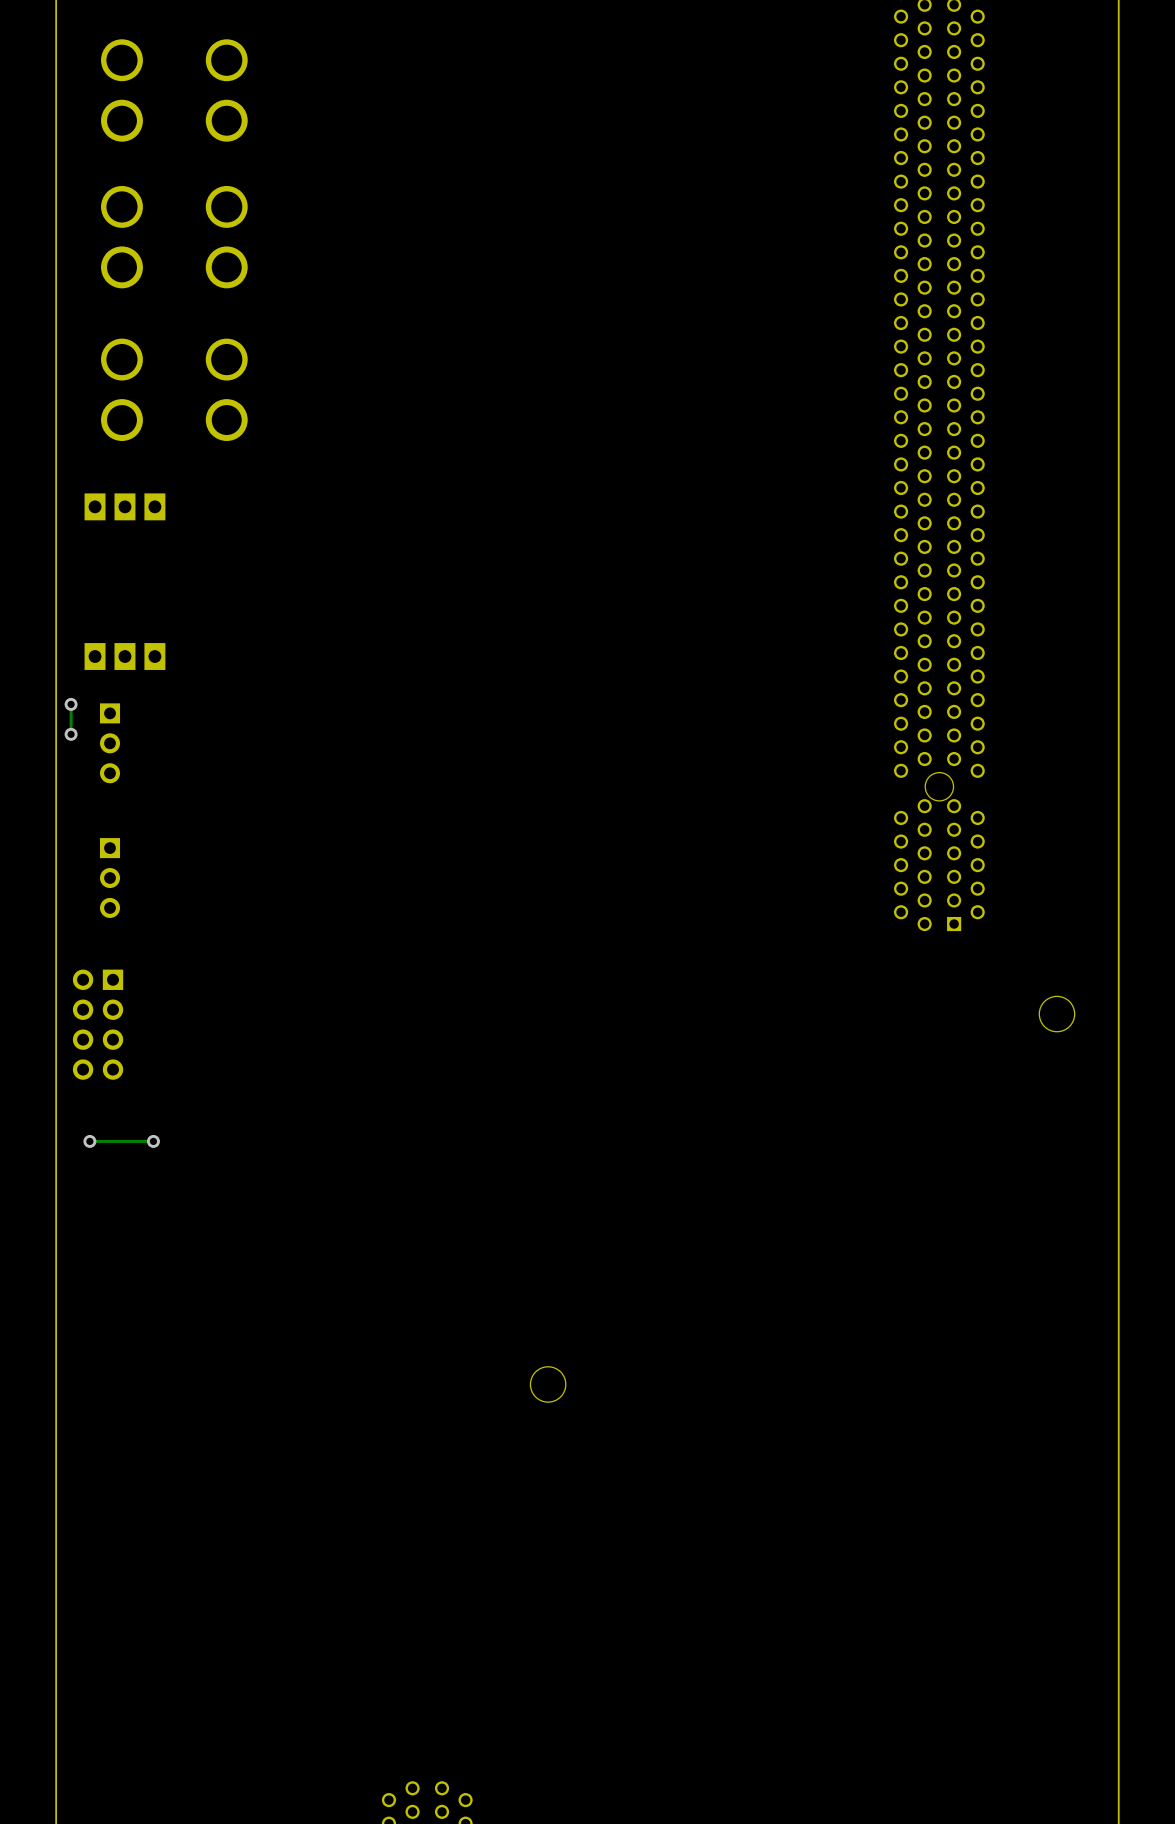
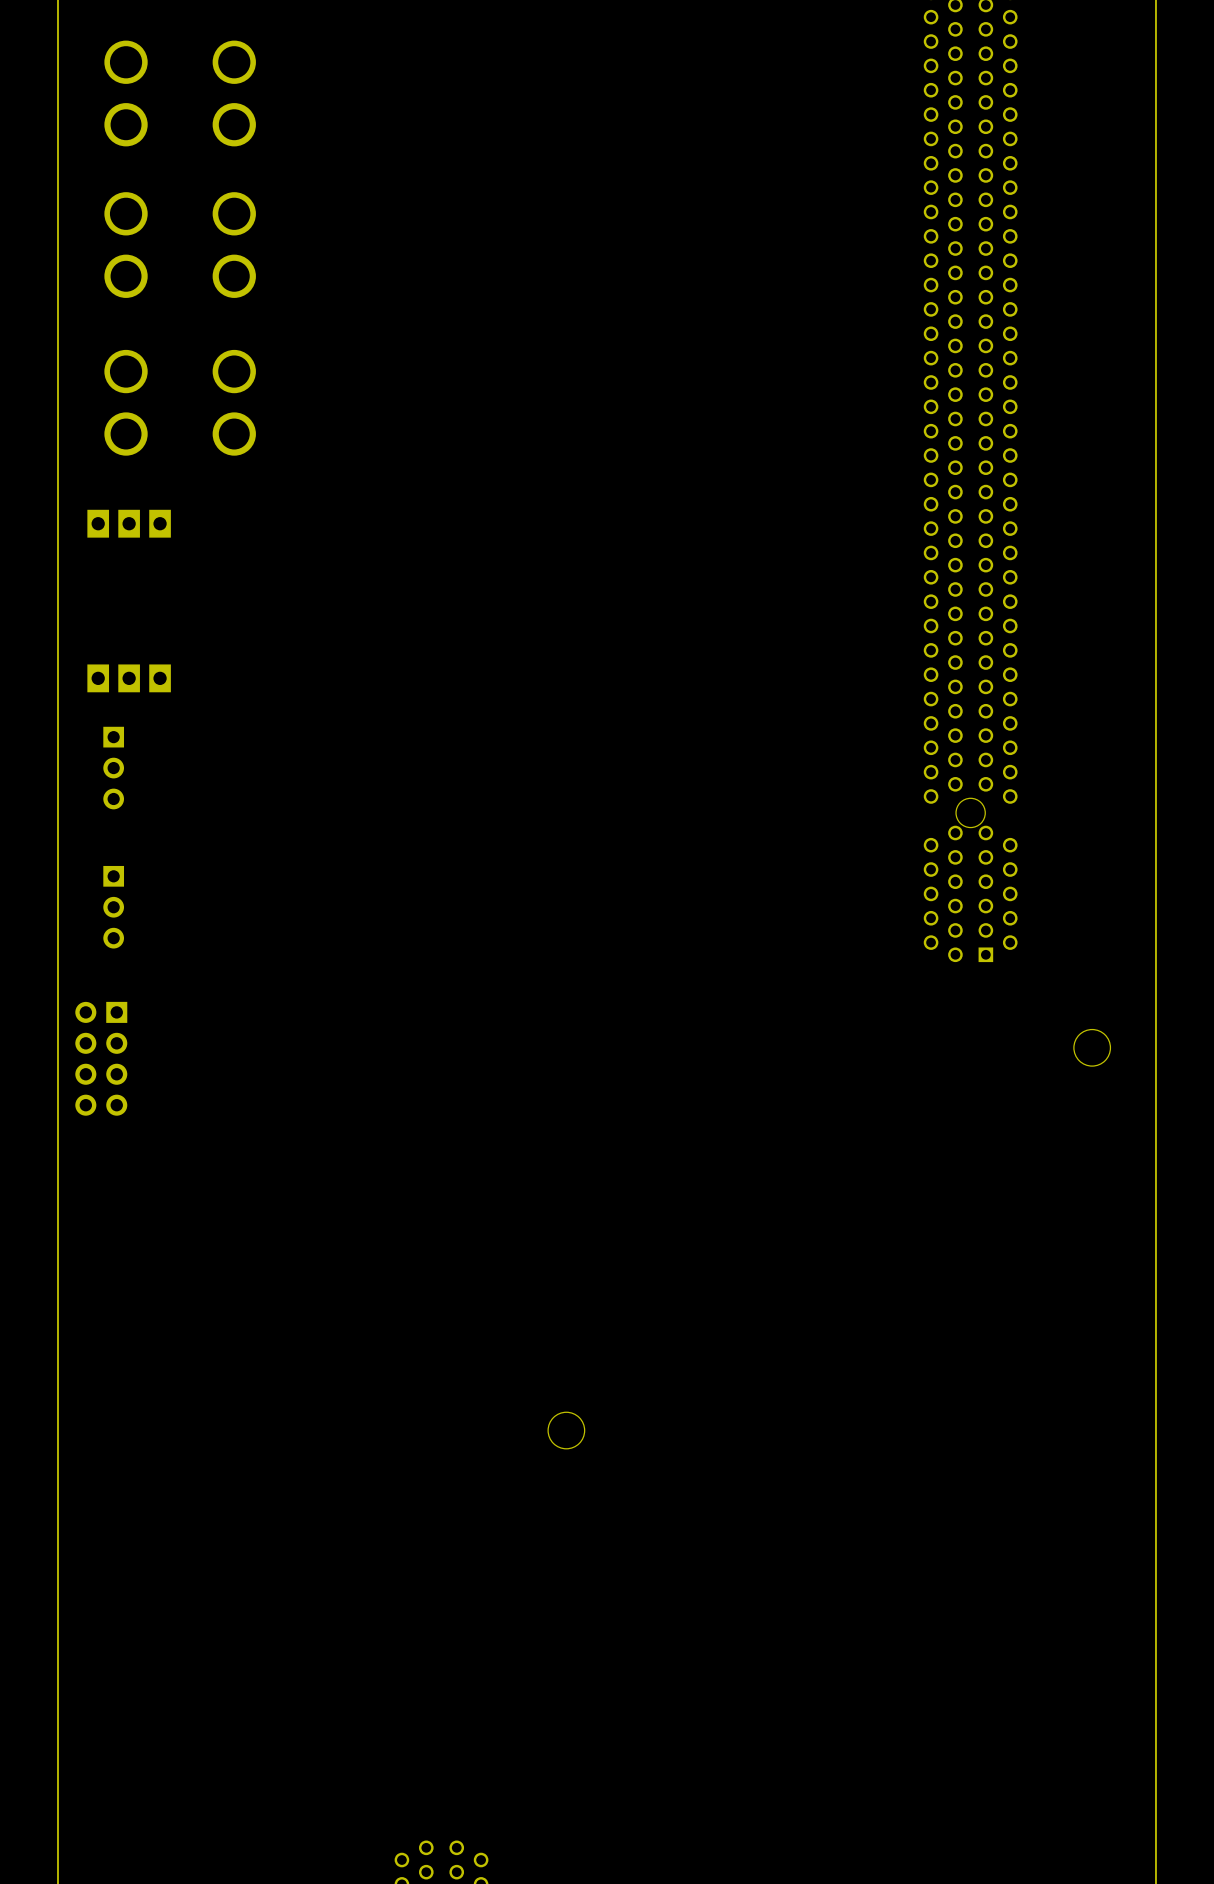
track: (71, 704) (71, 734) -> none
via: (71, 704) -> none
via: (71, 734) -> none
via: (89, 1141) -> none
track: (153, 1141) (89, 1141) -> none
via: (153, 1141) -> none

